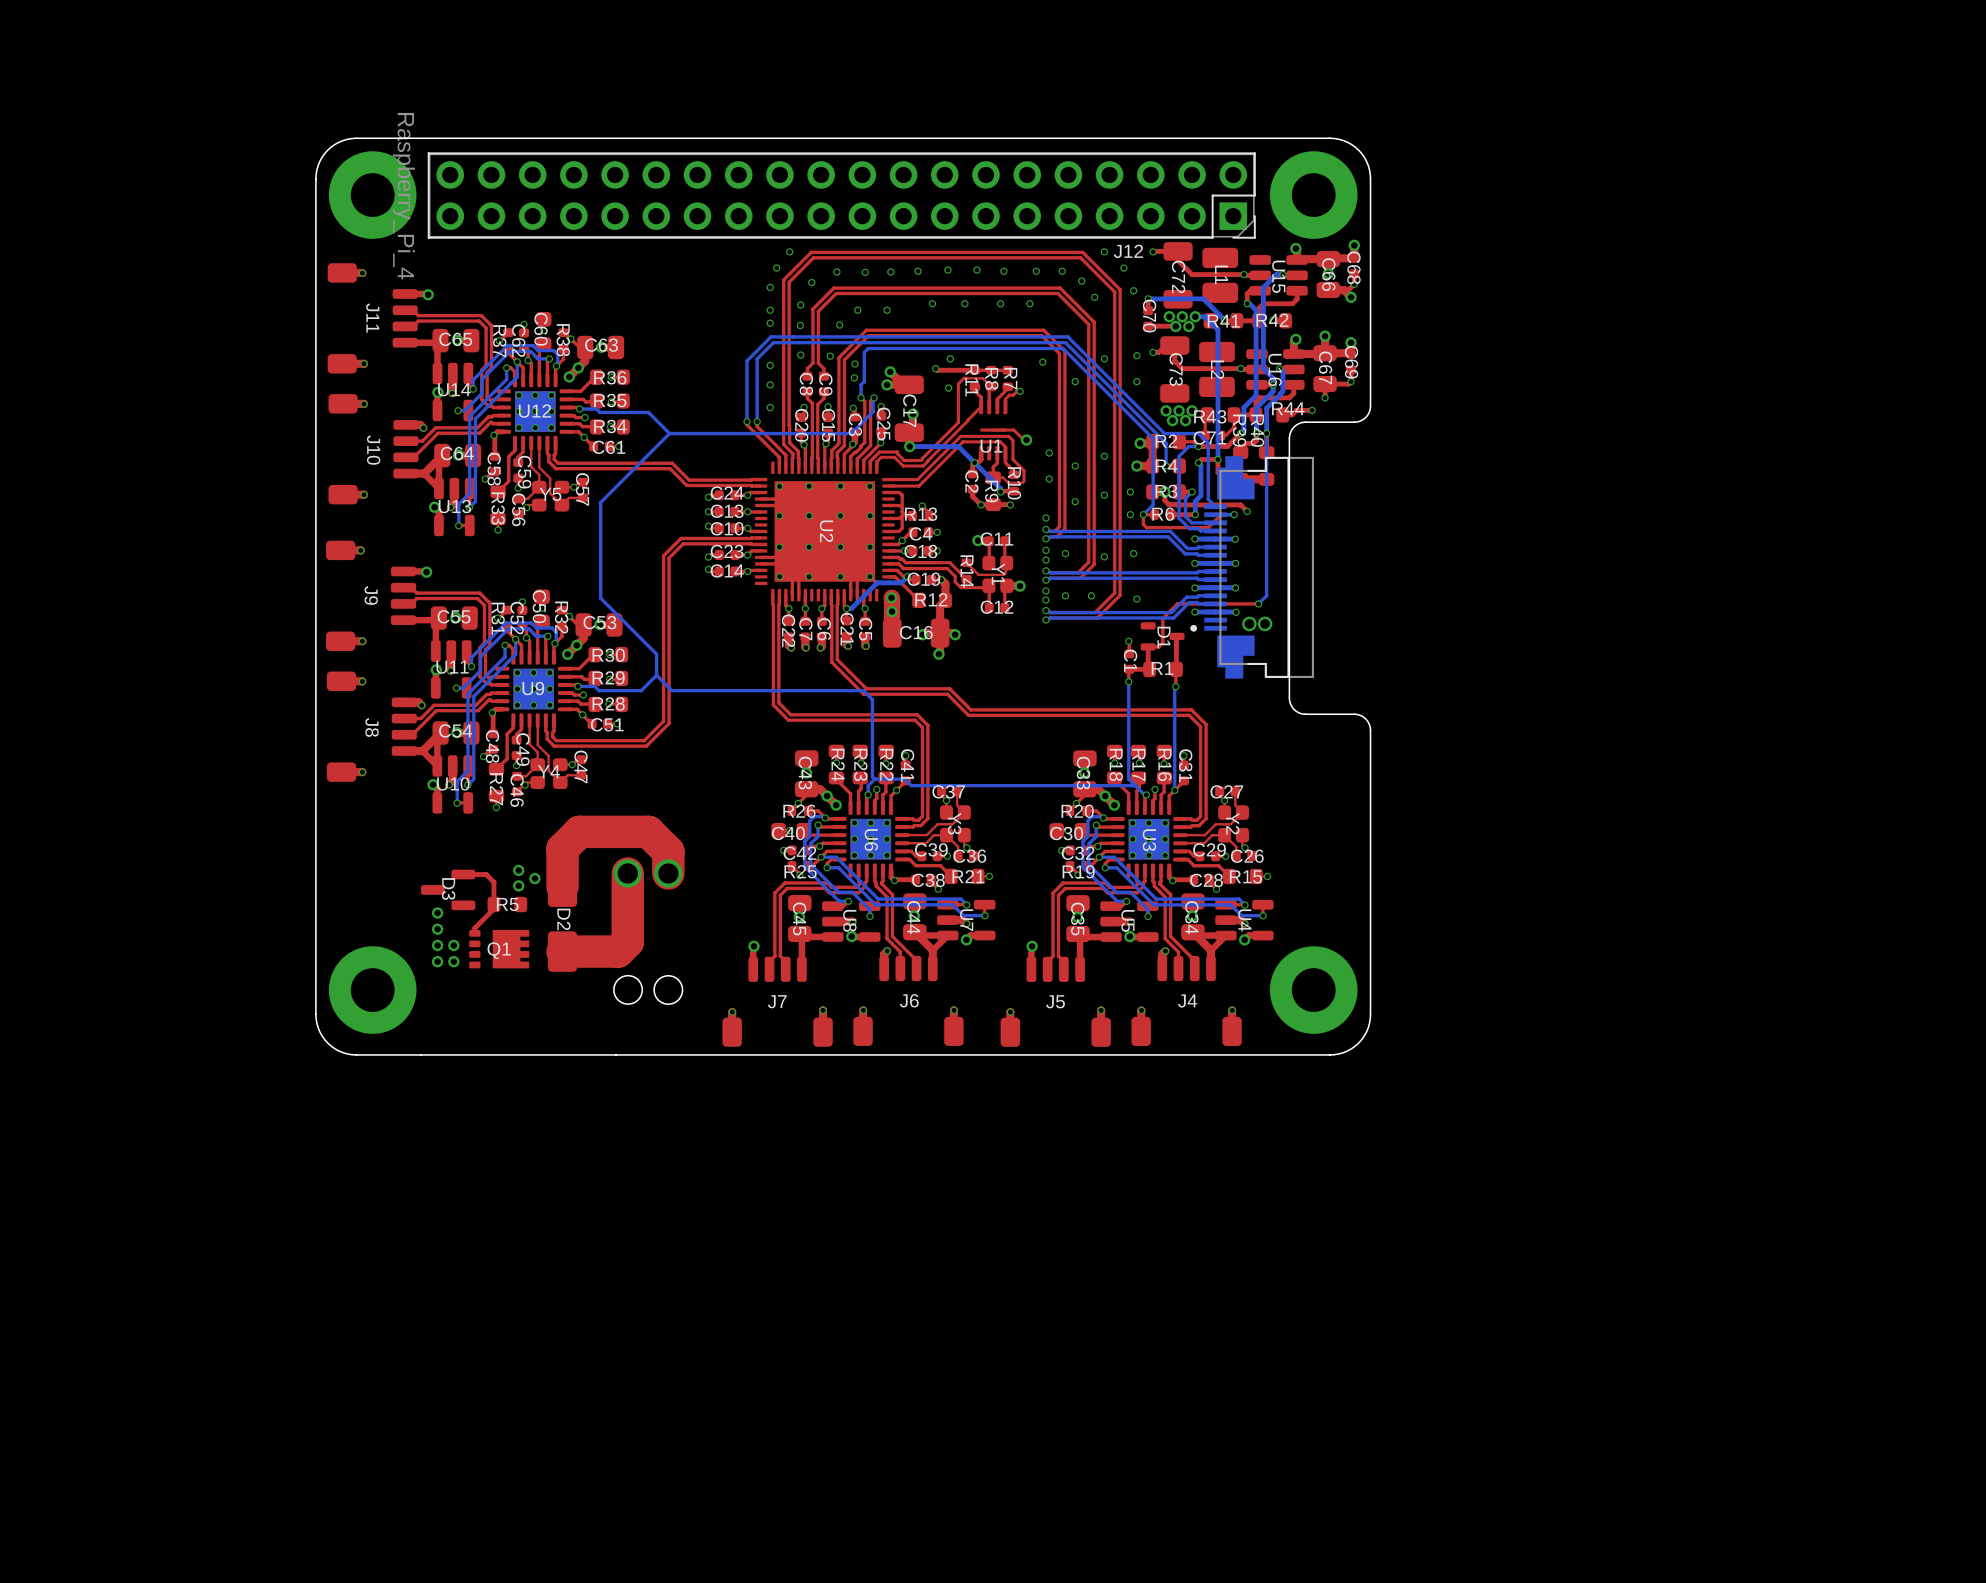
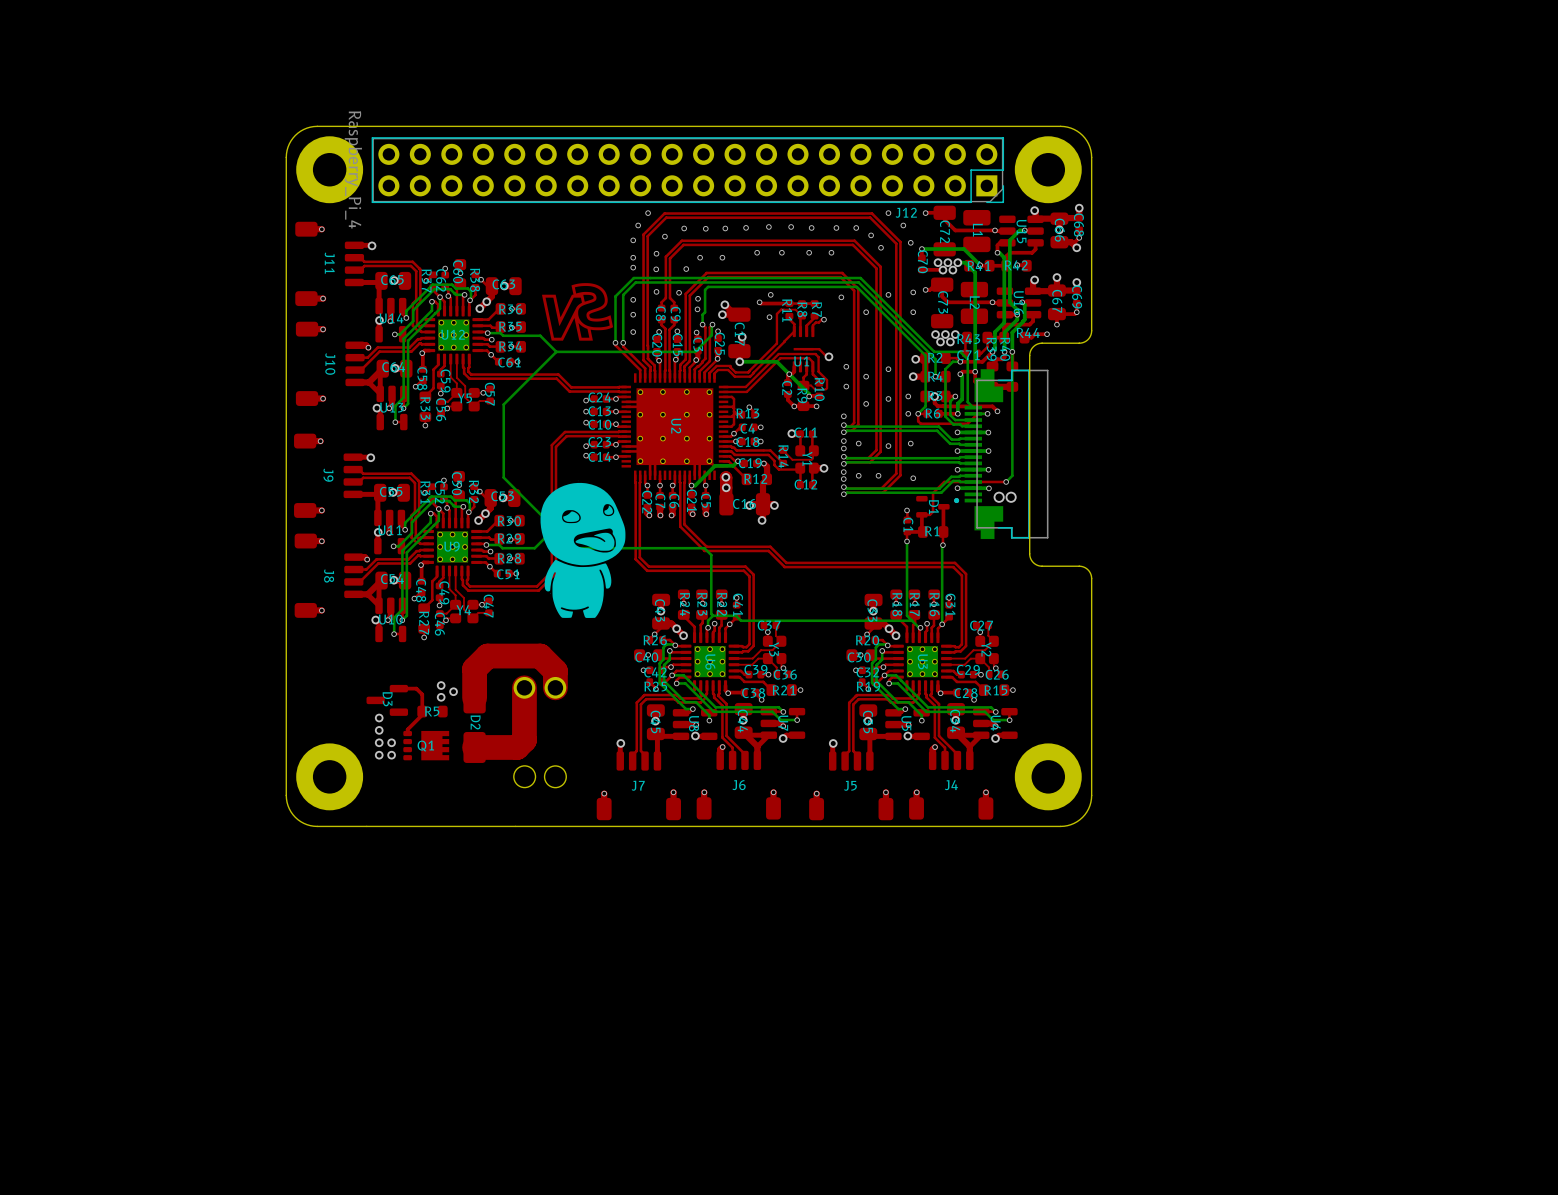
drawing: none -> [542, 283, 614, 341]
drawing: none -> [538, 480, 627, 618]

